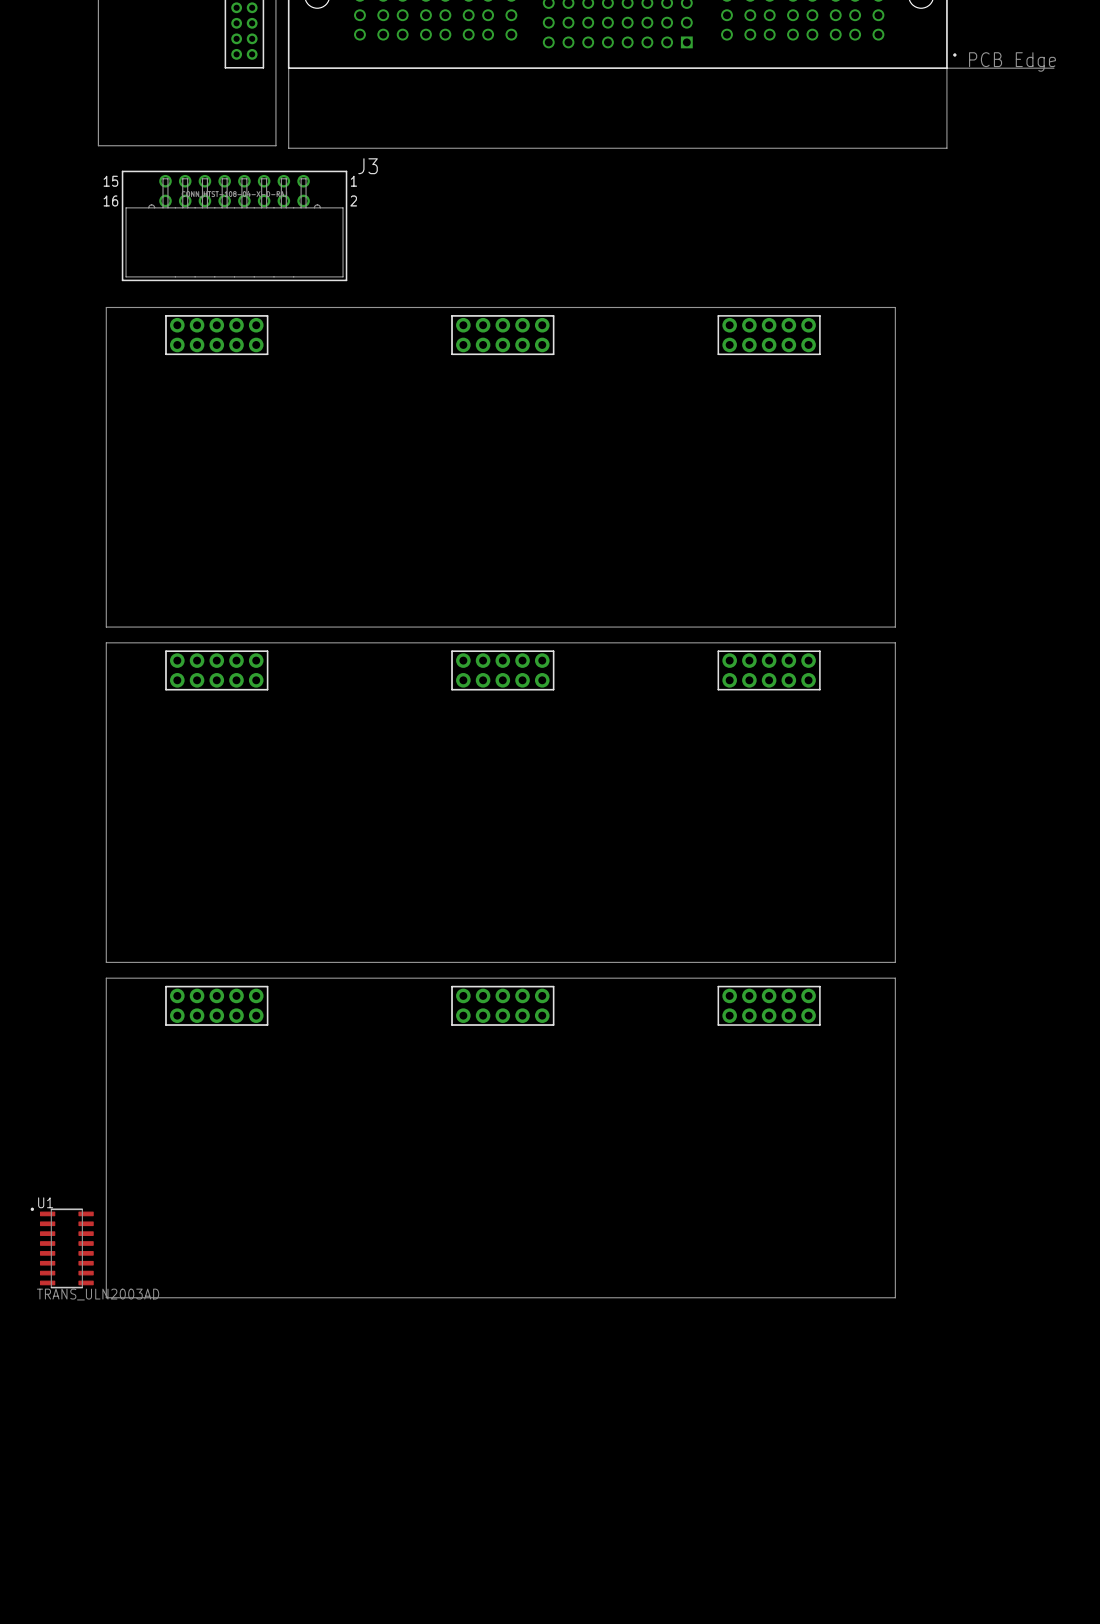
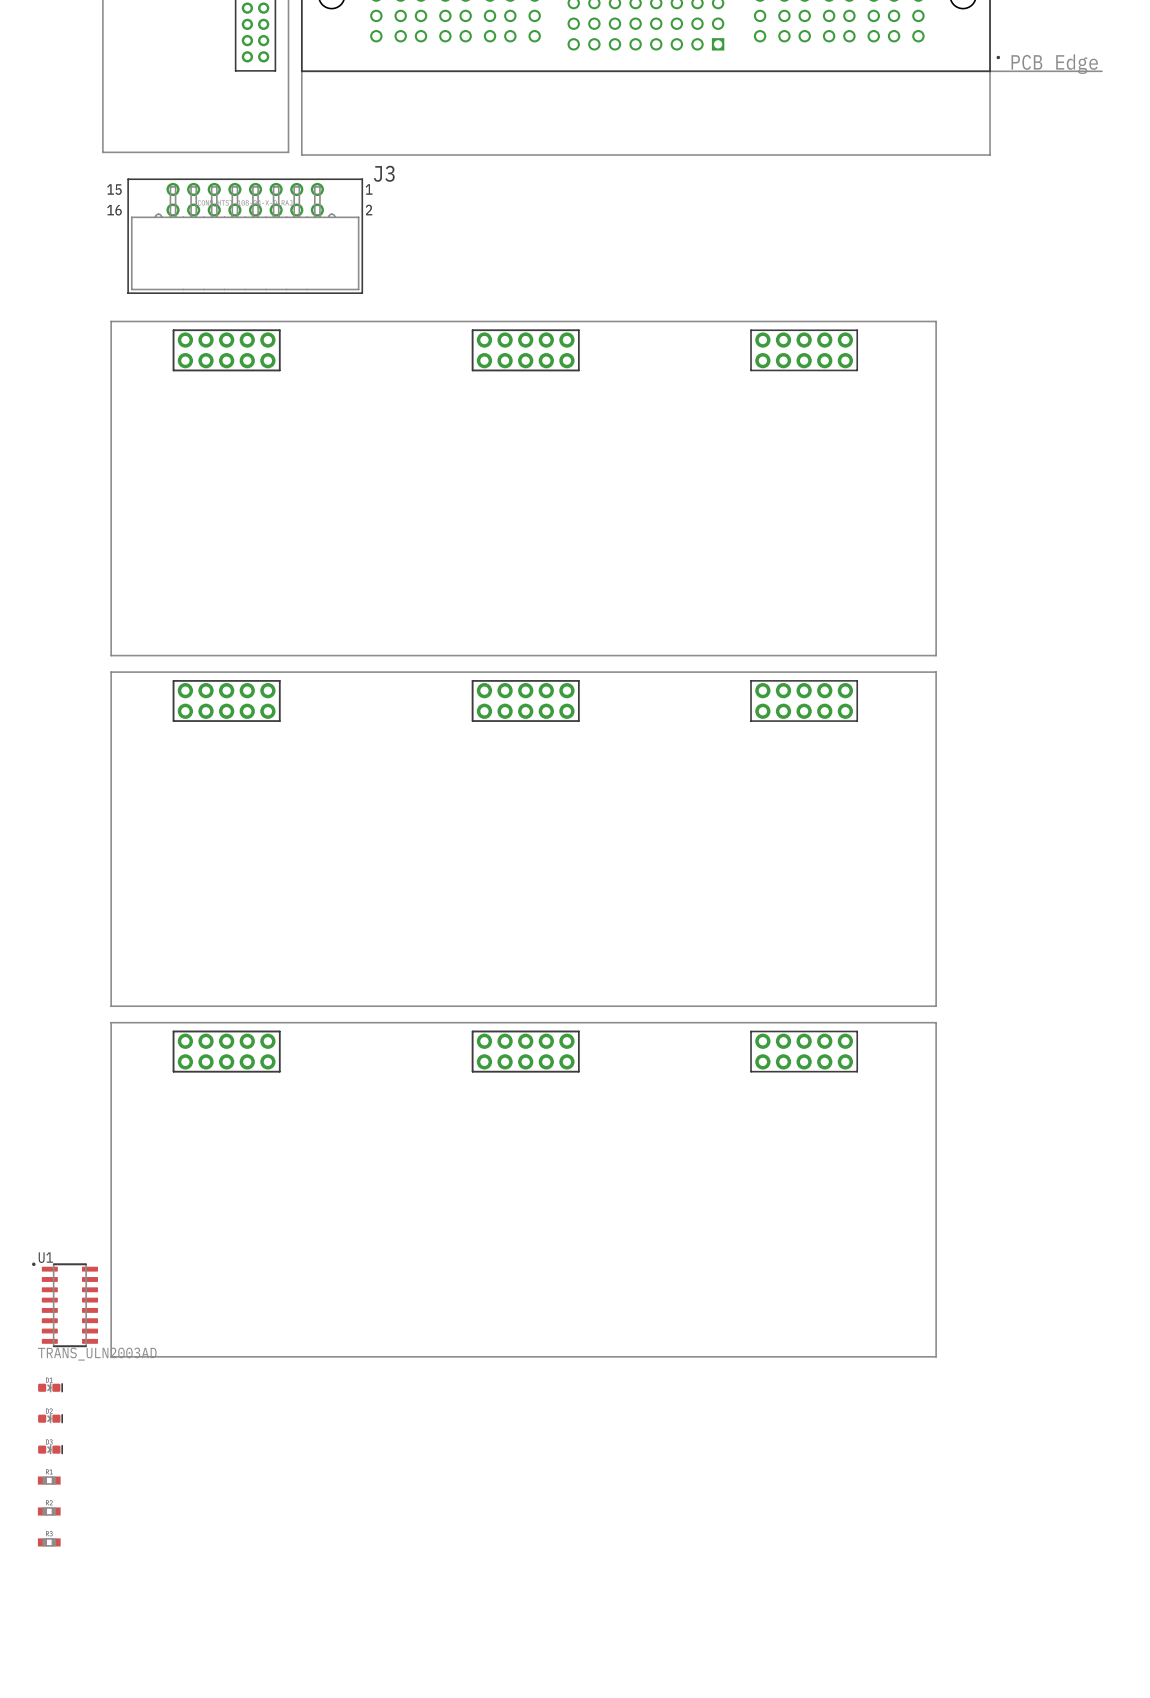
part: none -> (50, 1387)
part: none -> (50, 1418)
part: none -> (50, 1449)
part: none -> (49, 1480)
part: none -> (49, 1511)
part: none -> (49, 1542)

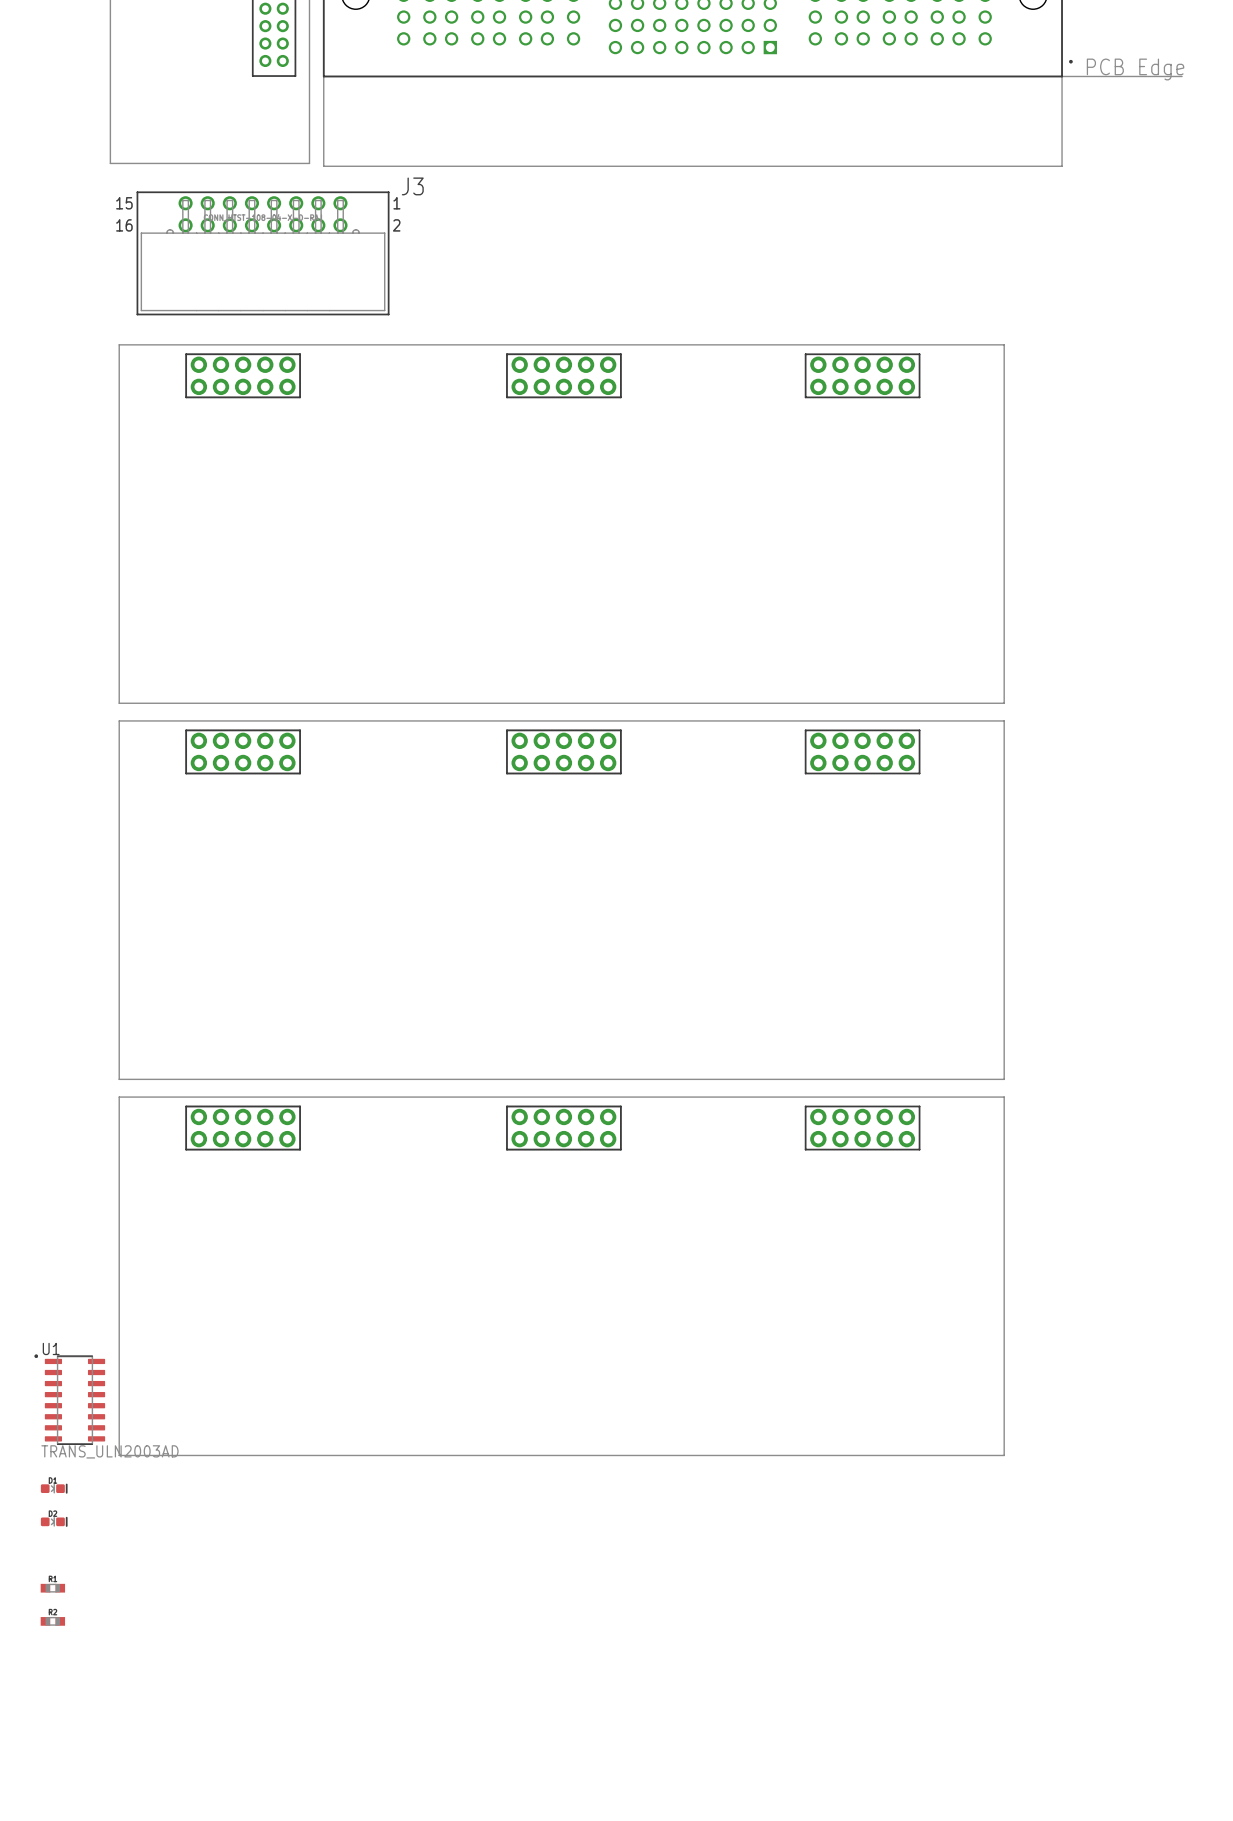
part: (50, 1449) -> none
part: (49, 1542) -> none

